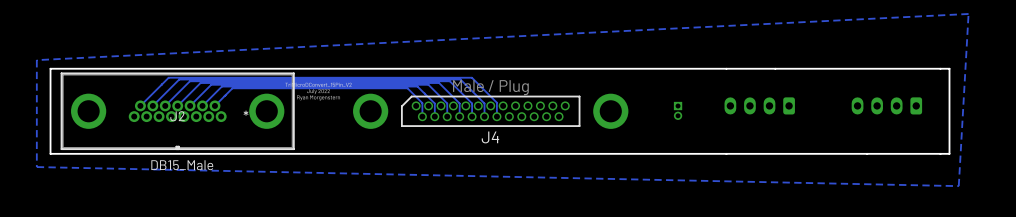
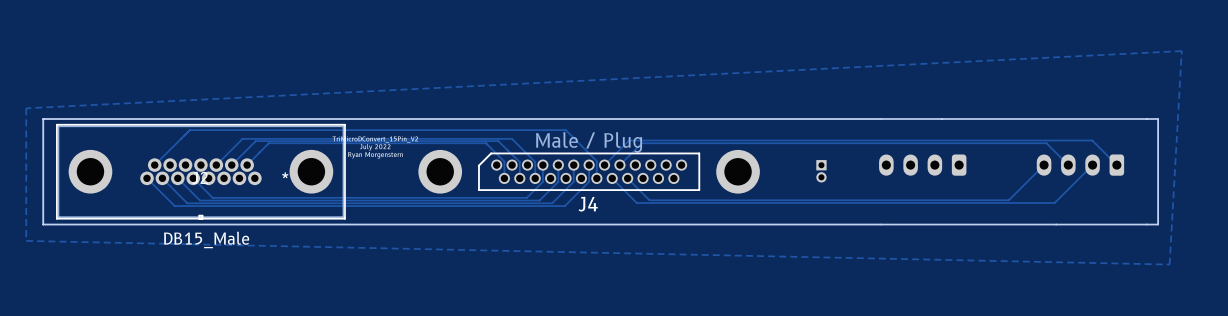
track: (152, 105) (179, 79) (460, 79) (484, 103) (484, 116) -> none
track: (165, 105) (189, 81) (449, 81) (472, 103) (472, 116) -> none
track: (177, 105) (200, 83) (439, 83) (459, 103) (459, 116) -> none
track: none -> (542, 165) (542, 181) (526, 197) (212, 197) (193, 178)
track: none -> (558, 165) (558, 181) (539, 200) (200, 200) (177, 178)
track: none -> (573, 165) (573, 181) (552, 203) (187, 203) (162, 178)
track: none -> (589, 165) (589, 181) (564, 206) (174, 206) (147, 178)
track: none -> (1044, 165) (1008, 200) (649, 200) (627, 178)
track: none -> (1068, 165) (1046, 143) (641, 143) (619, 165)
track: none -> (1092, 165) (1054, 203) (636, 203) (612, 178)
track: none -> (1116, 165) (1092, 140) (629, 140) (604, 165)

